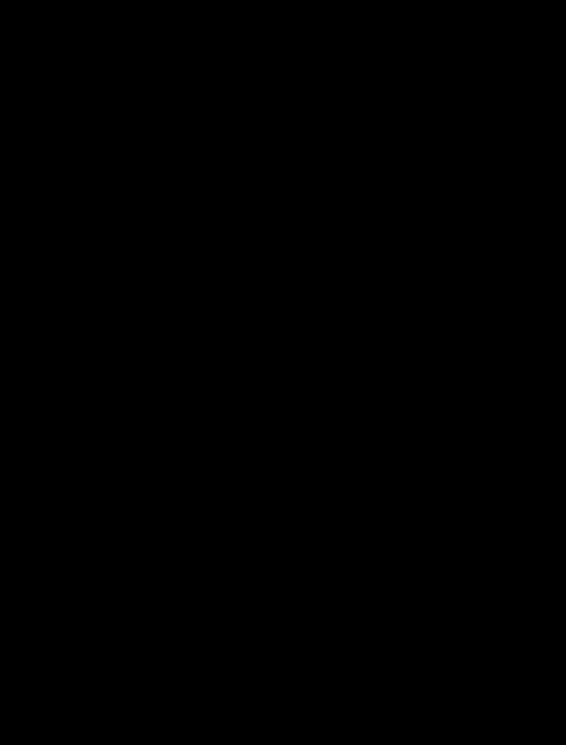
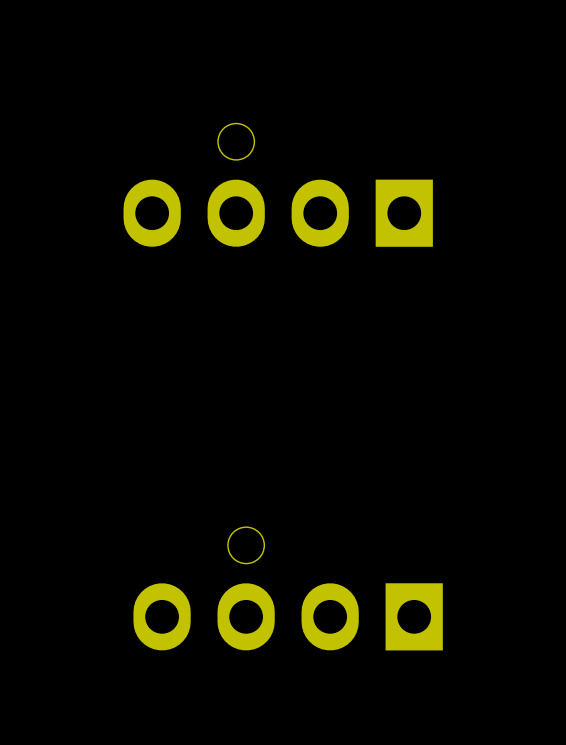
part: none -> (278, 185)
part: none -> (288, 588)

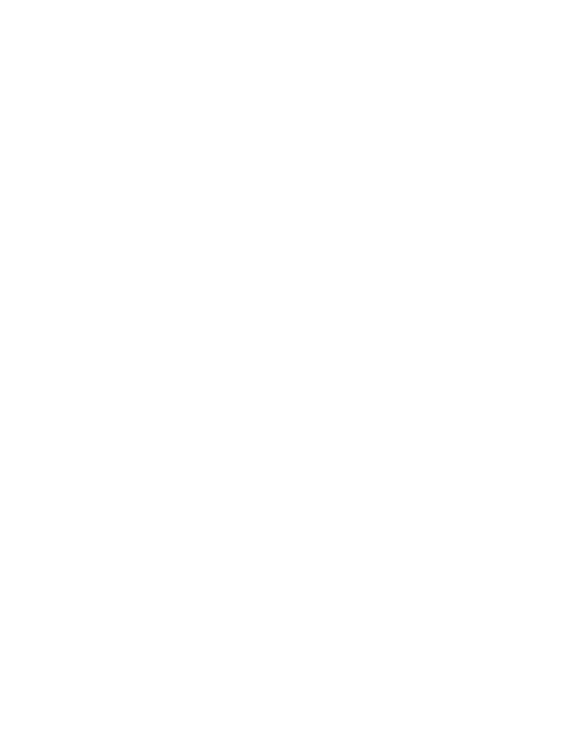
part: (278, 185) -> none
part: (288, 588) -> none

